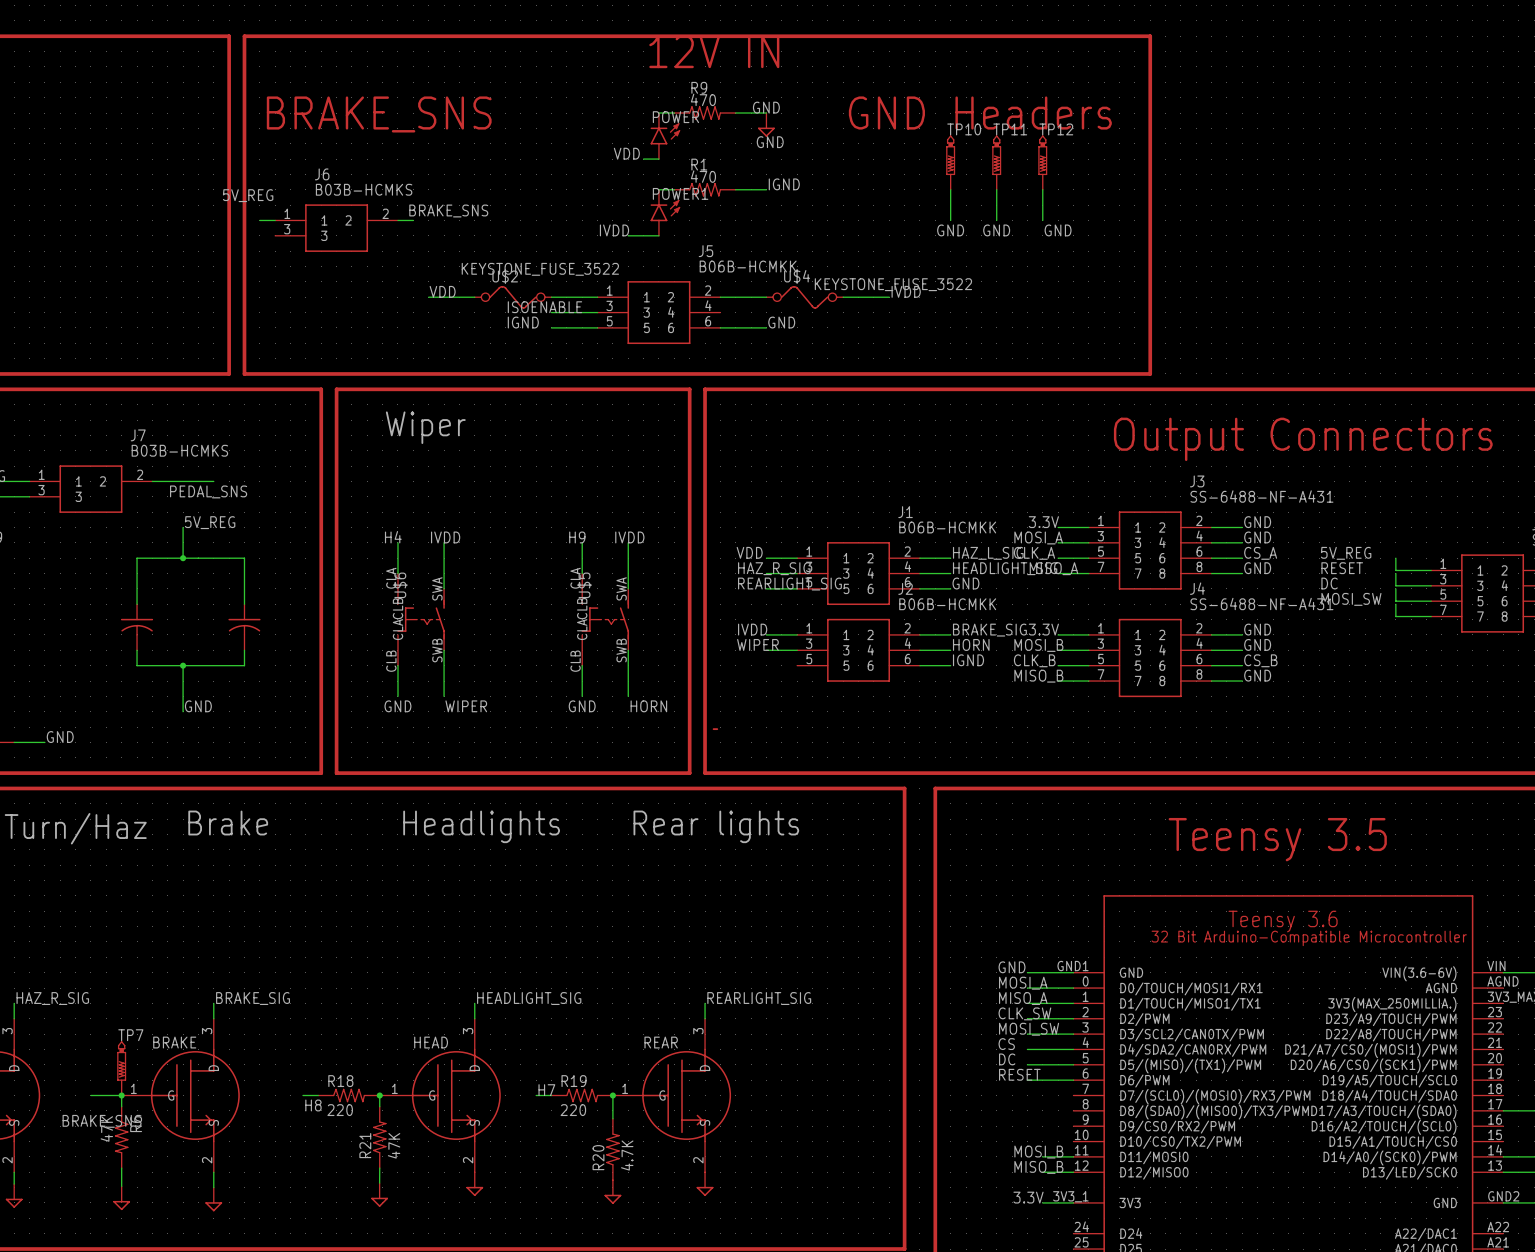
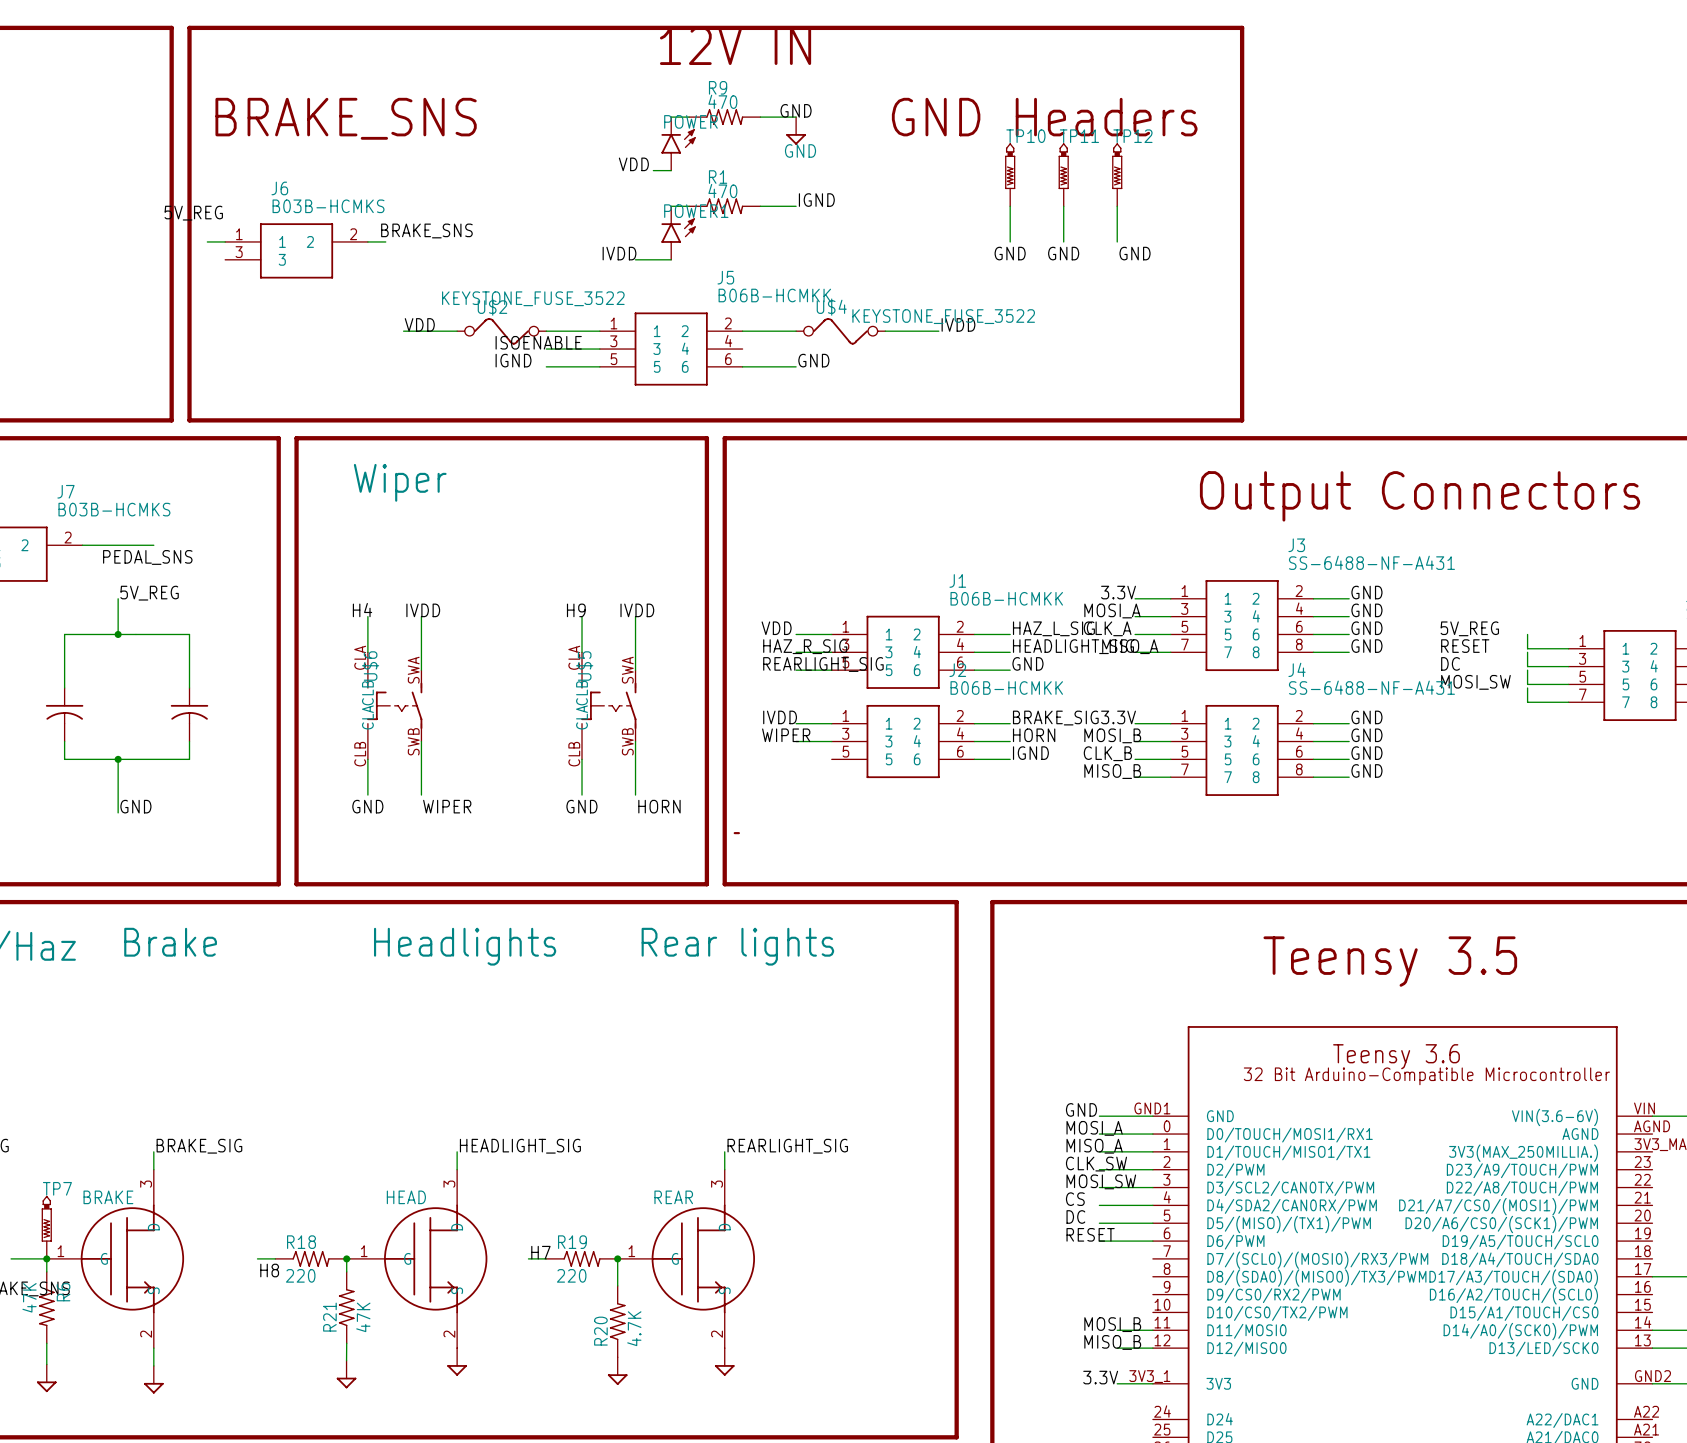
label: CS_A (1260, 553) -> GND (1366, 628)
label: CS_B (1260, 660) -> GND (1366, 753)

